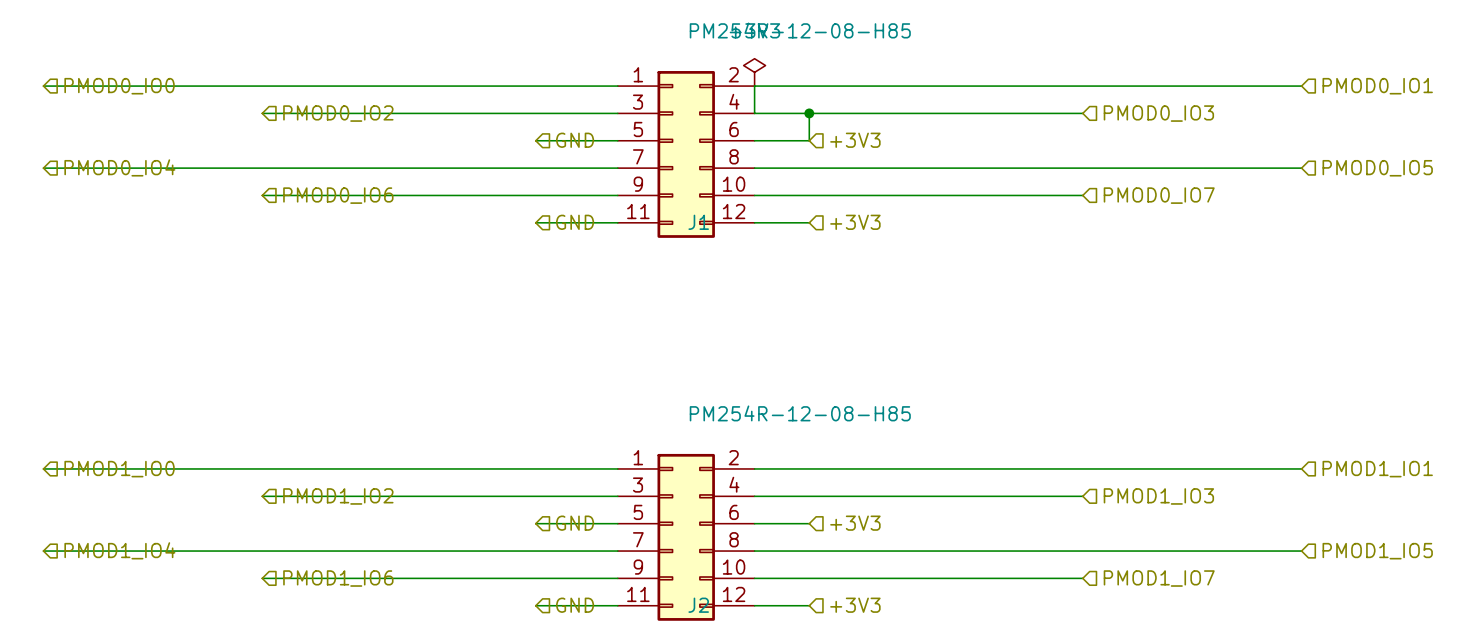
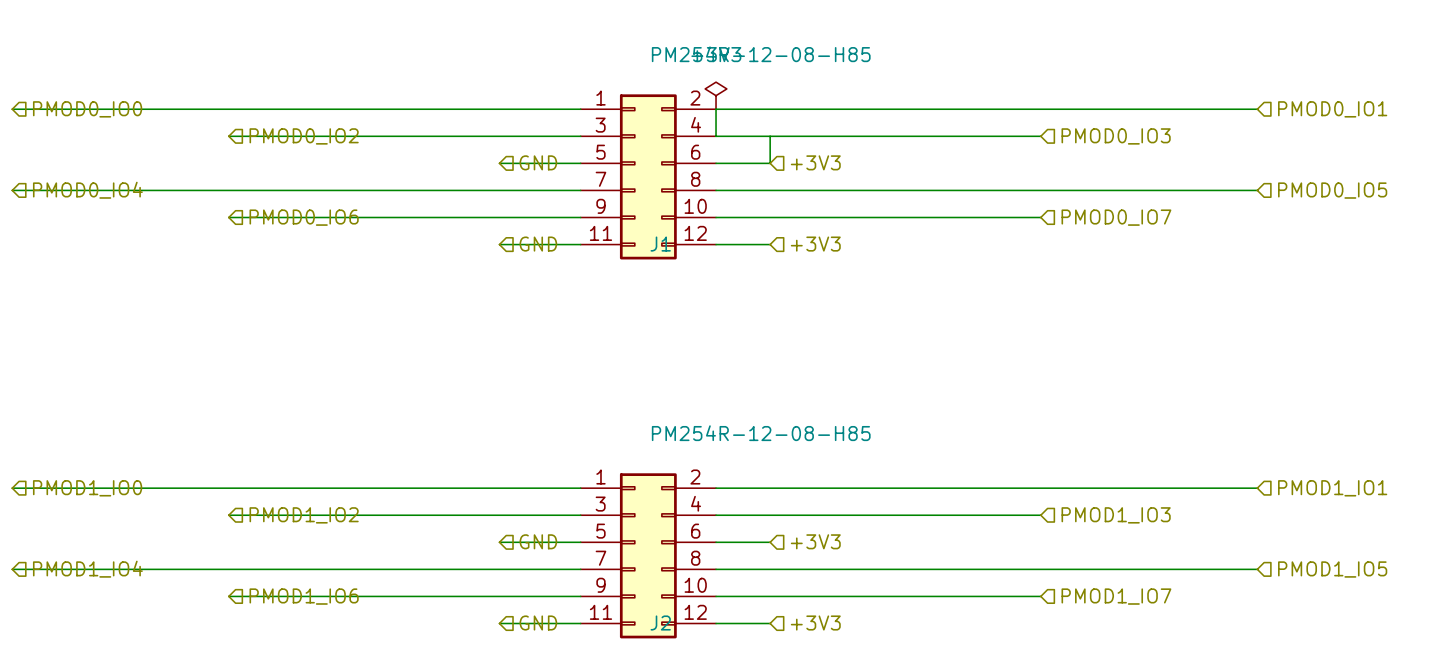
junction: (809, 113) -> none

